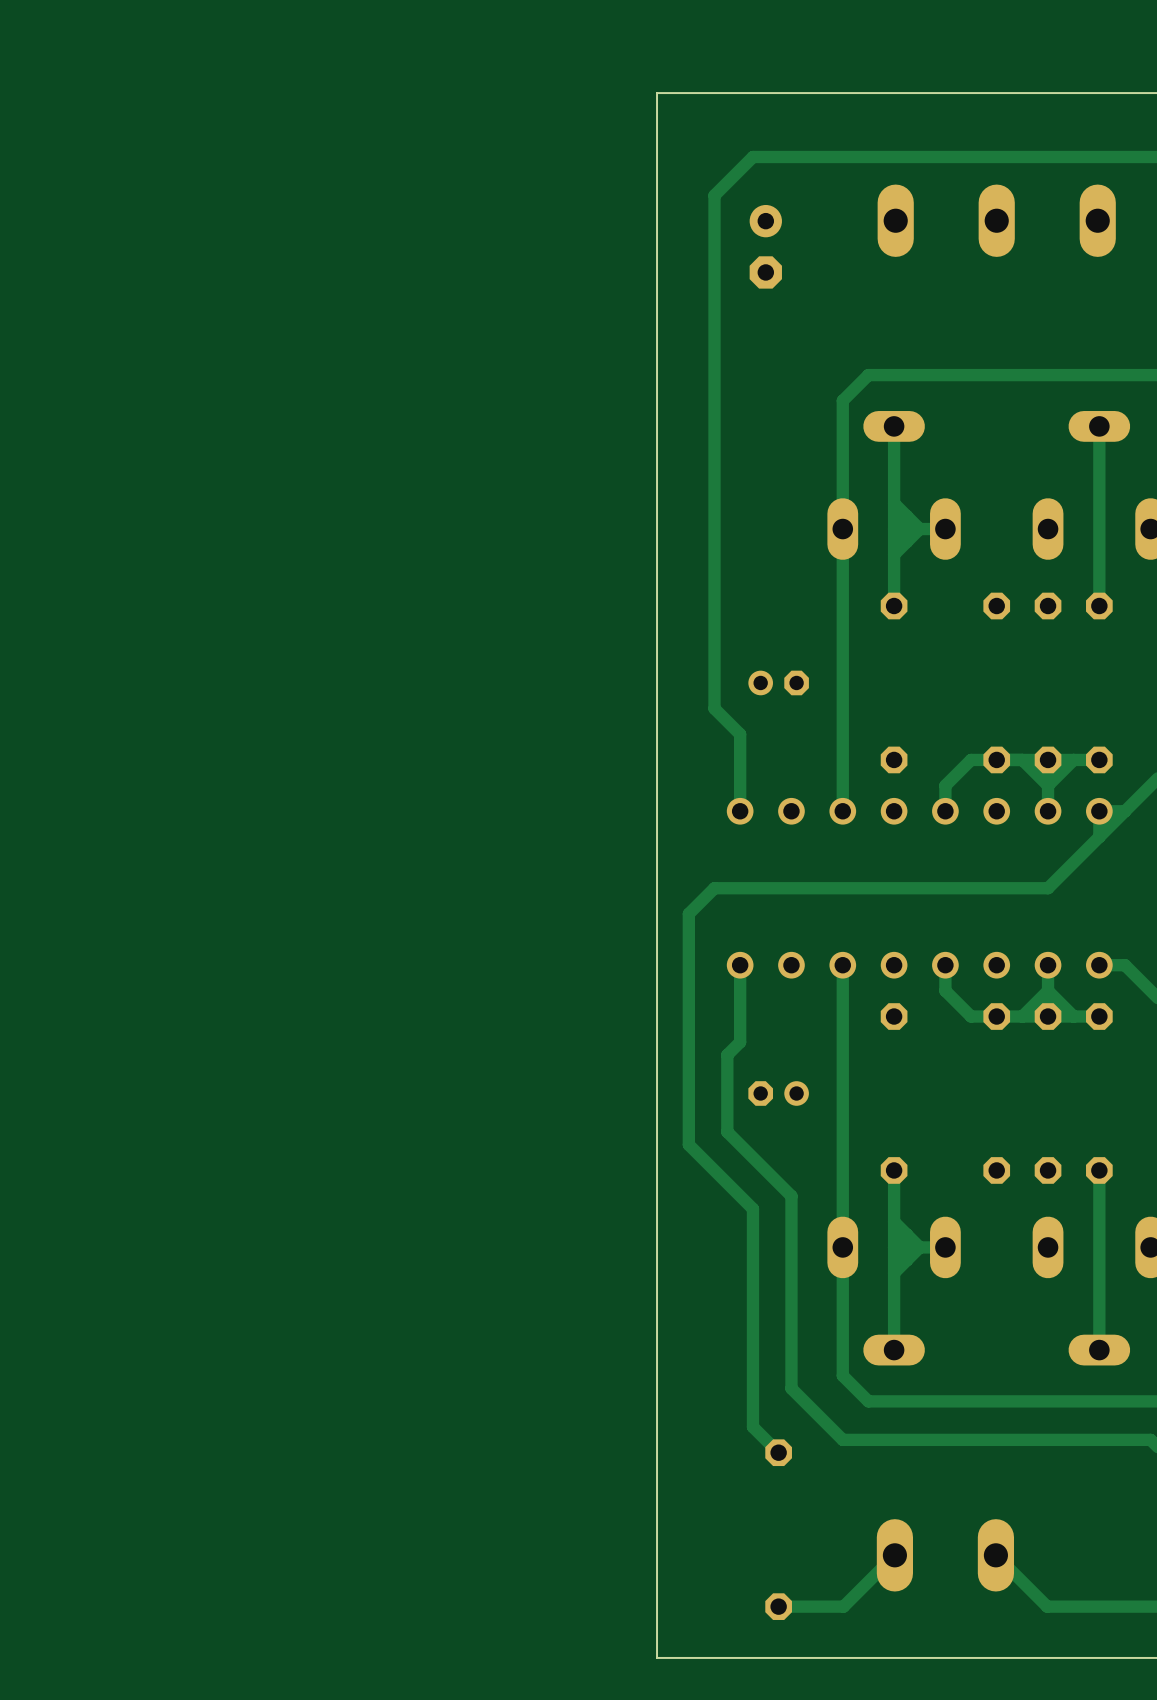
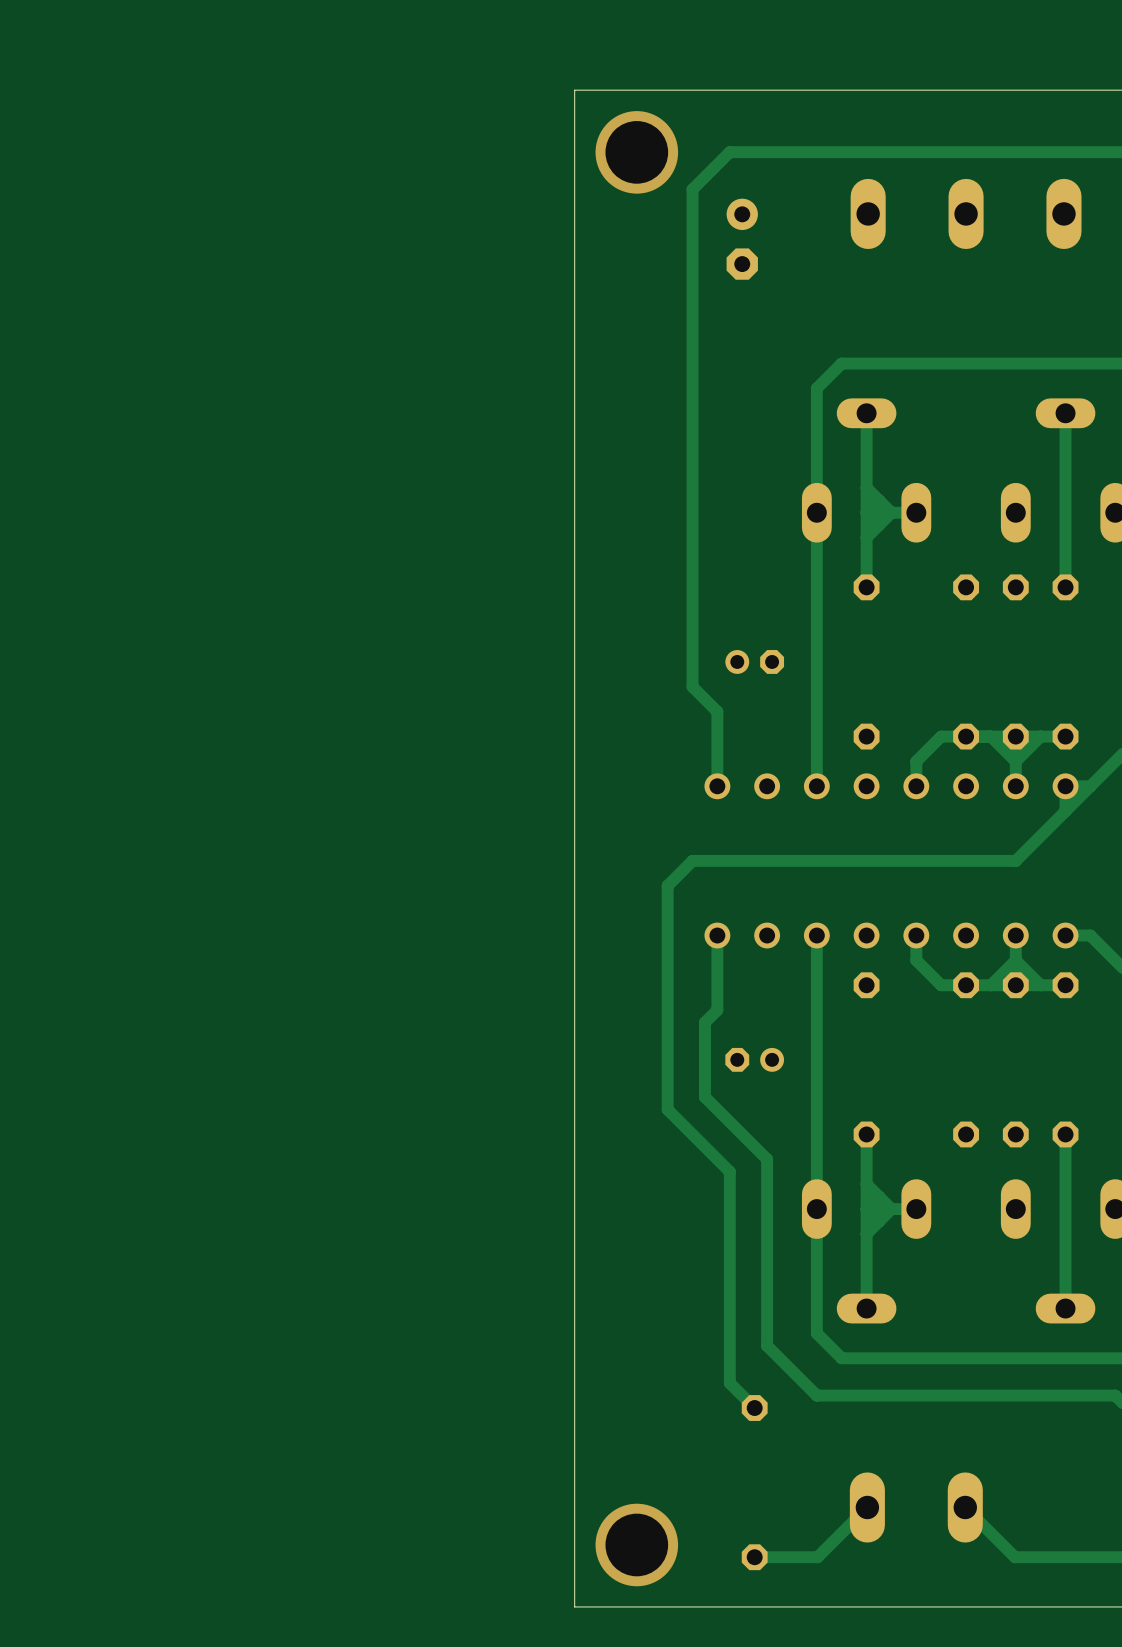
board edge: (657, 93) (657, 1657) -> (636, 90) (574, 90) (574, 1606) (636, 1606)
via: none -> (636, 152)
via: none -> (636, 1544)

